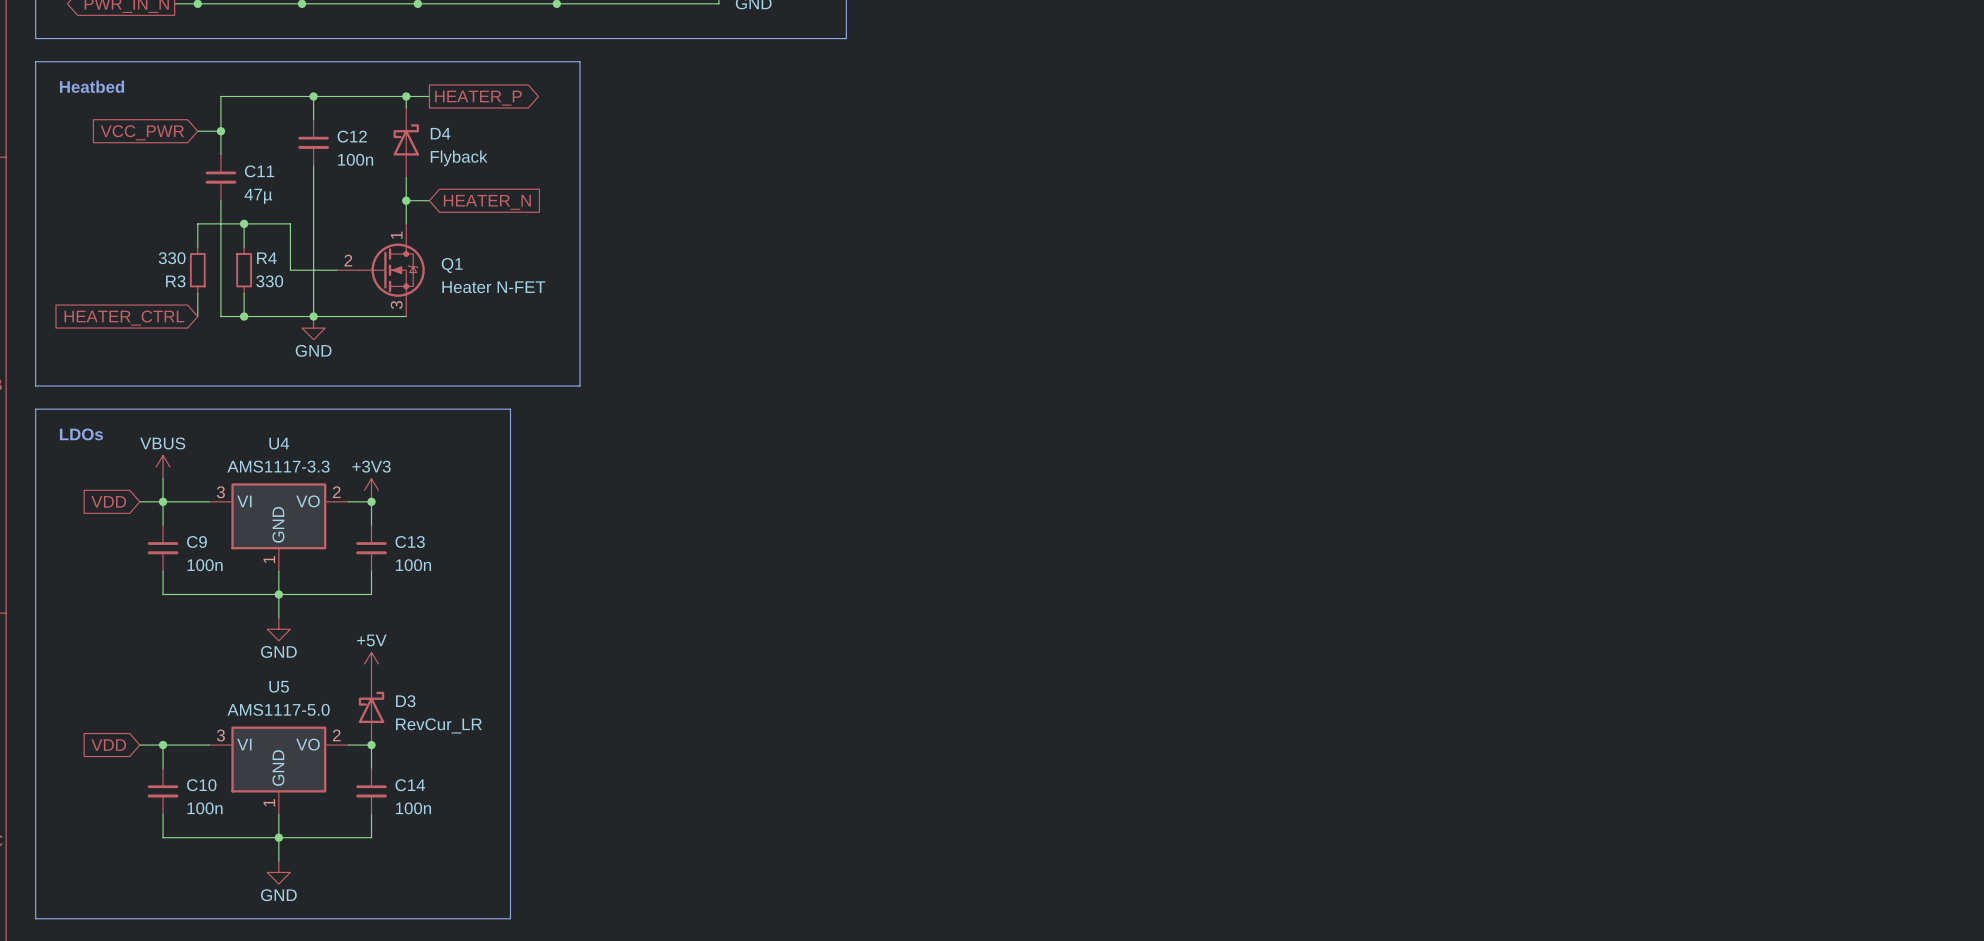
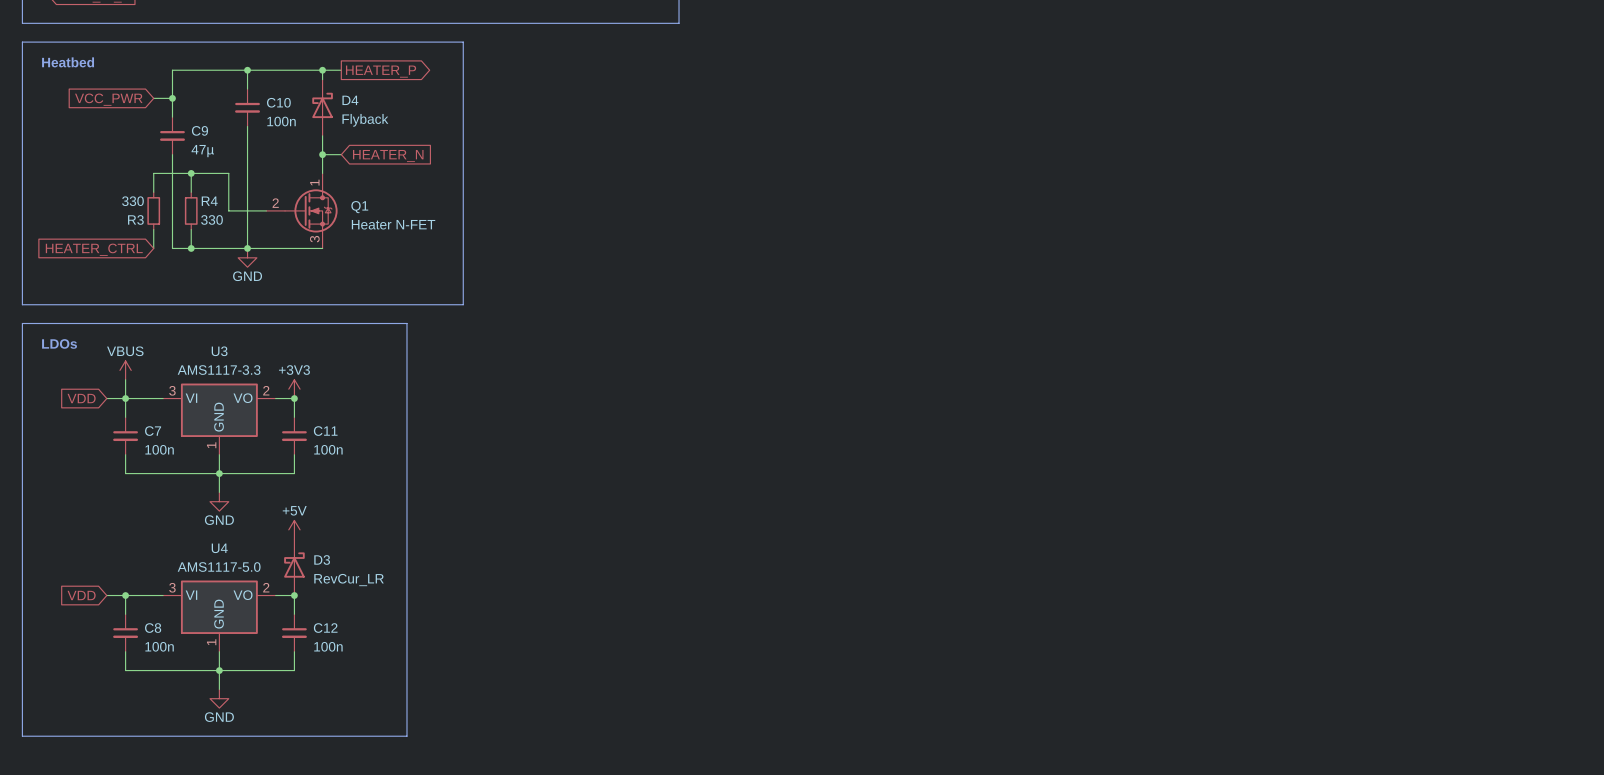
C12 name: C12 (352, 136) -> C10 (278, 102)
C11 name: C11 (259, 171) -> C9 (199, 130)
U4 name: U4 (279, 443) -> U3 (219, 351)
C9 name: C9 (196, 541) -> C7 (153, 431)
C13 name: C13 (410, 541) -> C11 (325, 431)
U5 name: U5 (279, 686) -> U4 (219, 548)
C10 name: C10 (201, 785) -> C8 (153, 628)
C14 name: C14 (410, 785) -> C12 (325, 628)

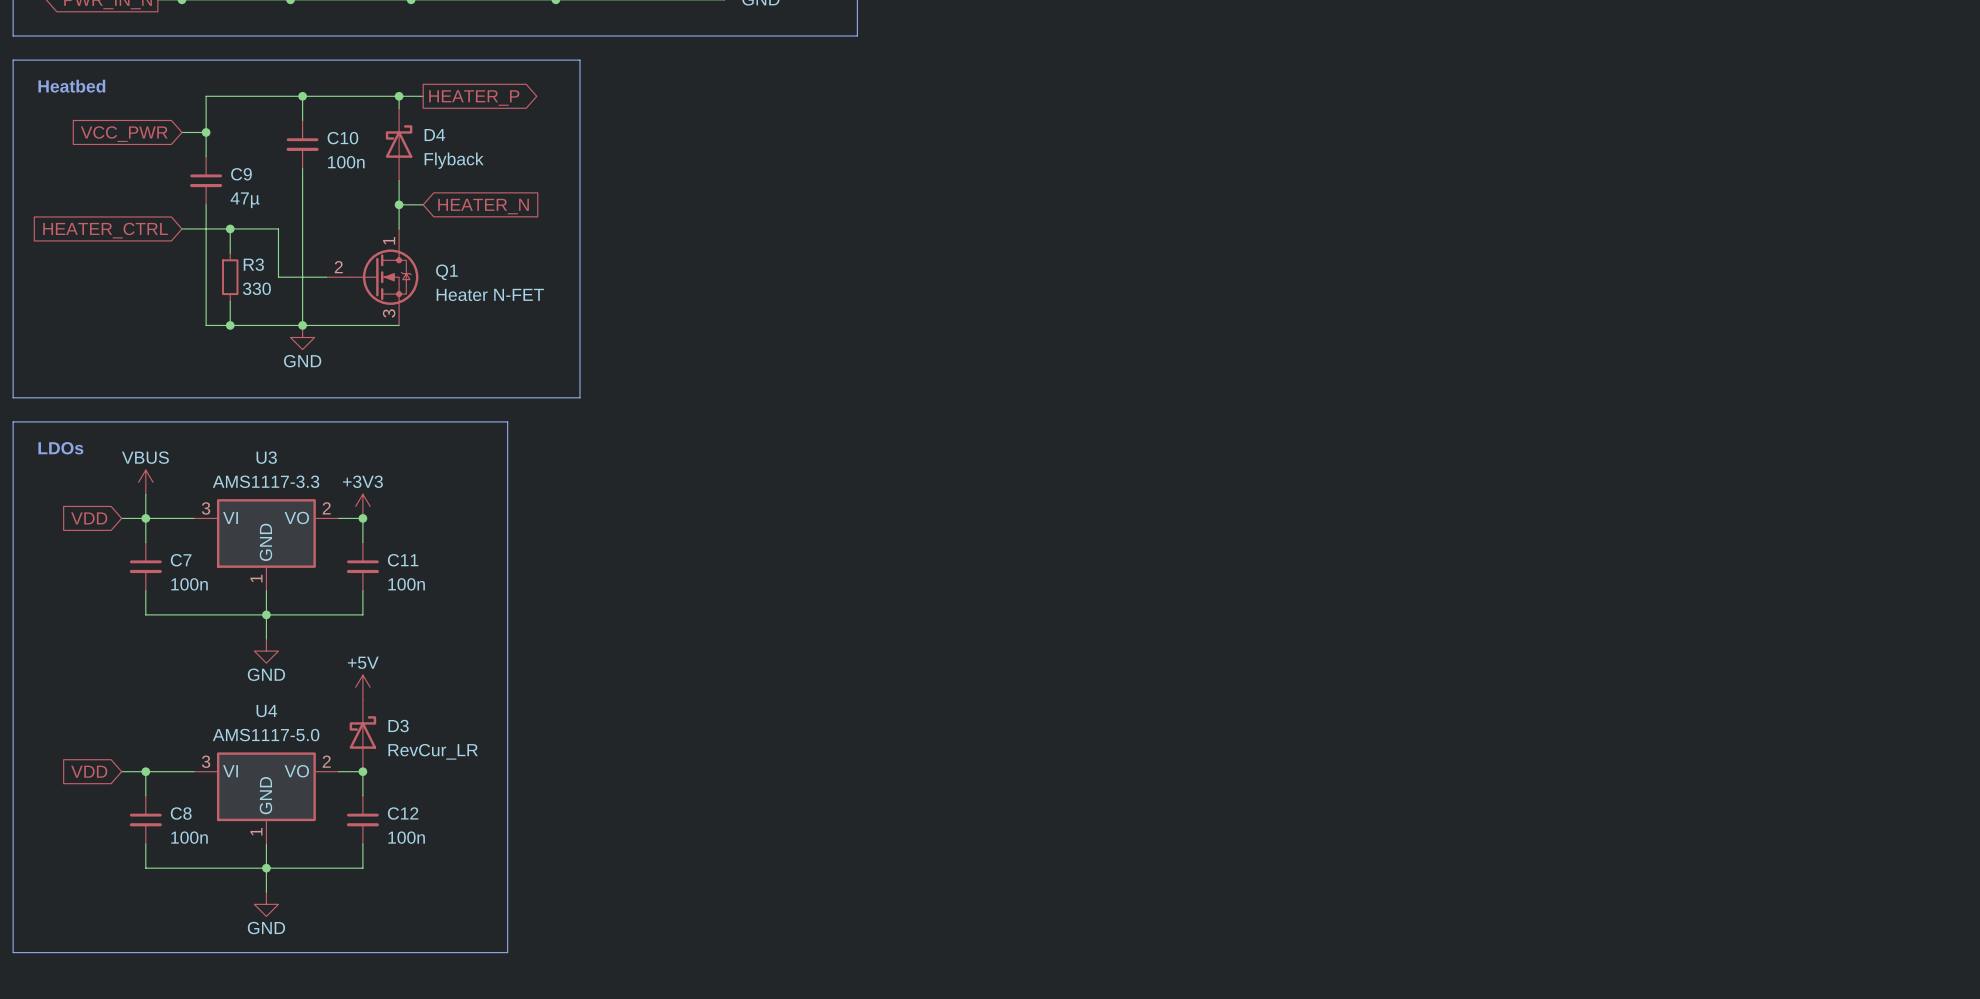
wire: (153, 173) (153, 192) -> none
R4 name: R4 (209, 201) -> R3 (253, 264)
R3: 330 (153, 210) -> none
wire: (153, 229) (153, 248) -> none
global label position: HEATER_CTRL (94, 249) -> HEATER_CTRL (105, 230)

